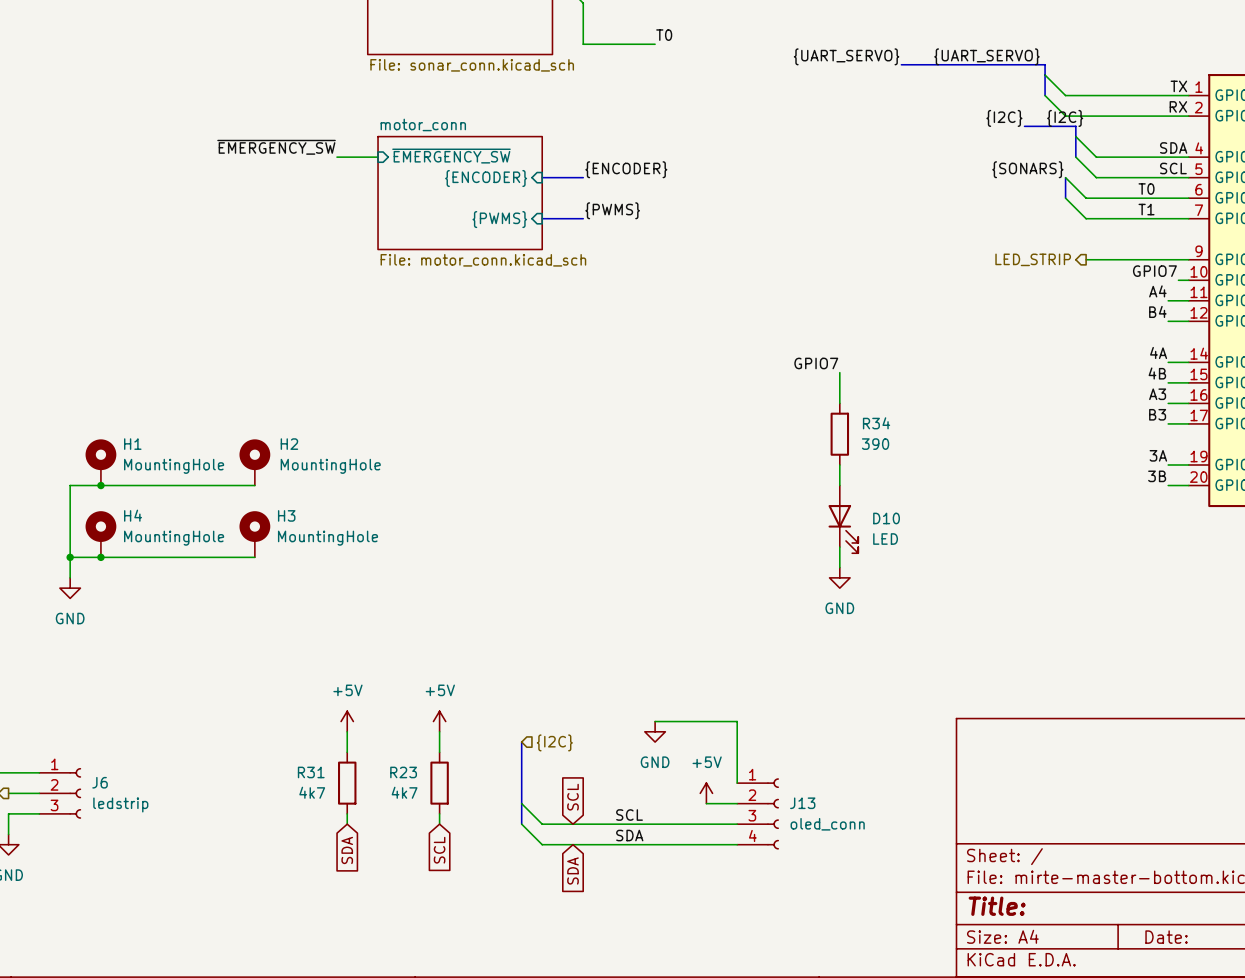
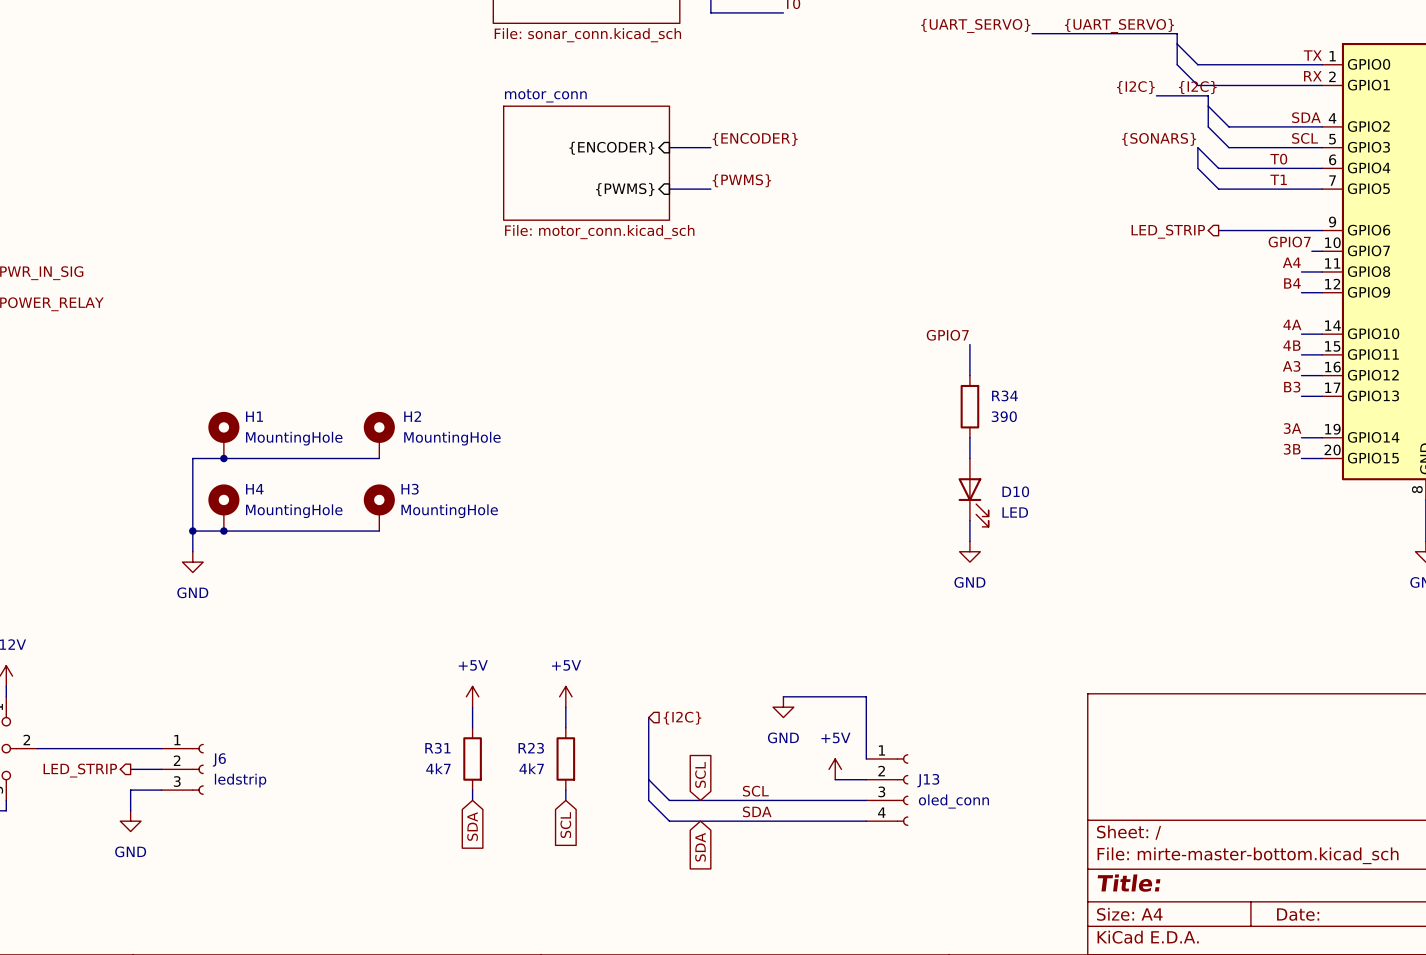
label: ~{EMERGENCY_SW} (276, 147) -> none
sheet pin: ~{EMERGENCY_SW} (451, 156) -> none
wire: (336, 157) (378, 157) -> none

